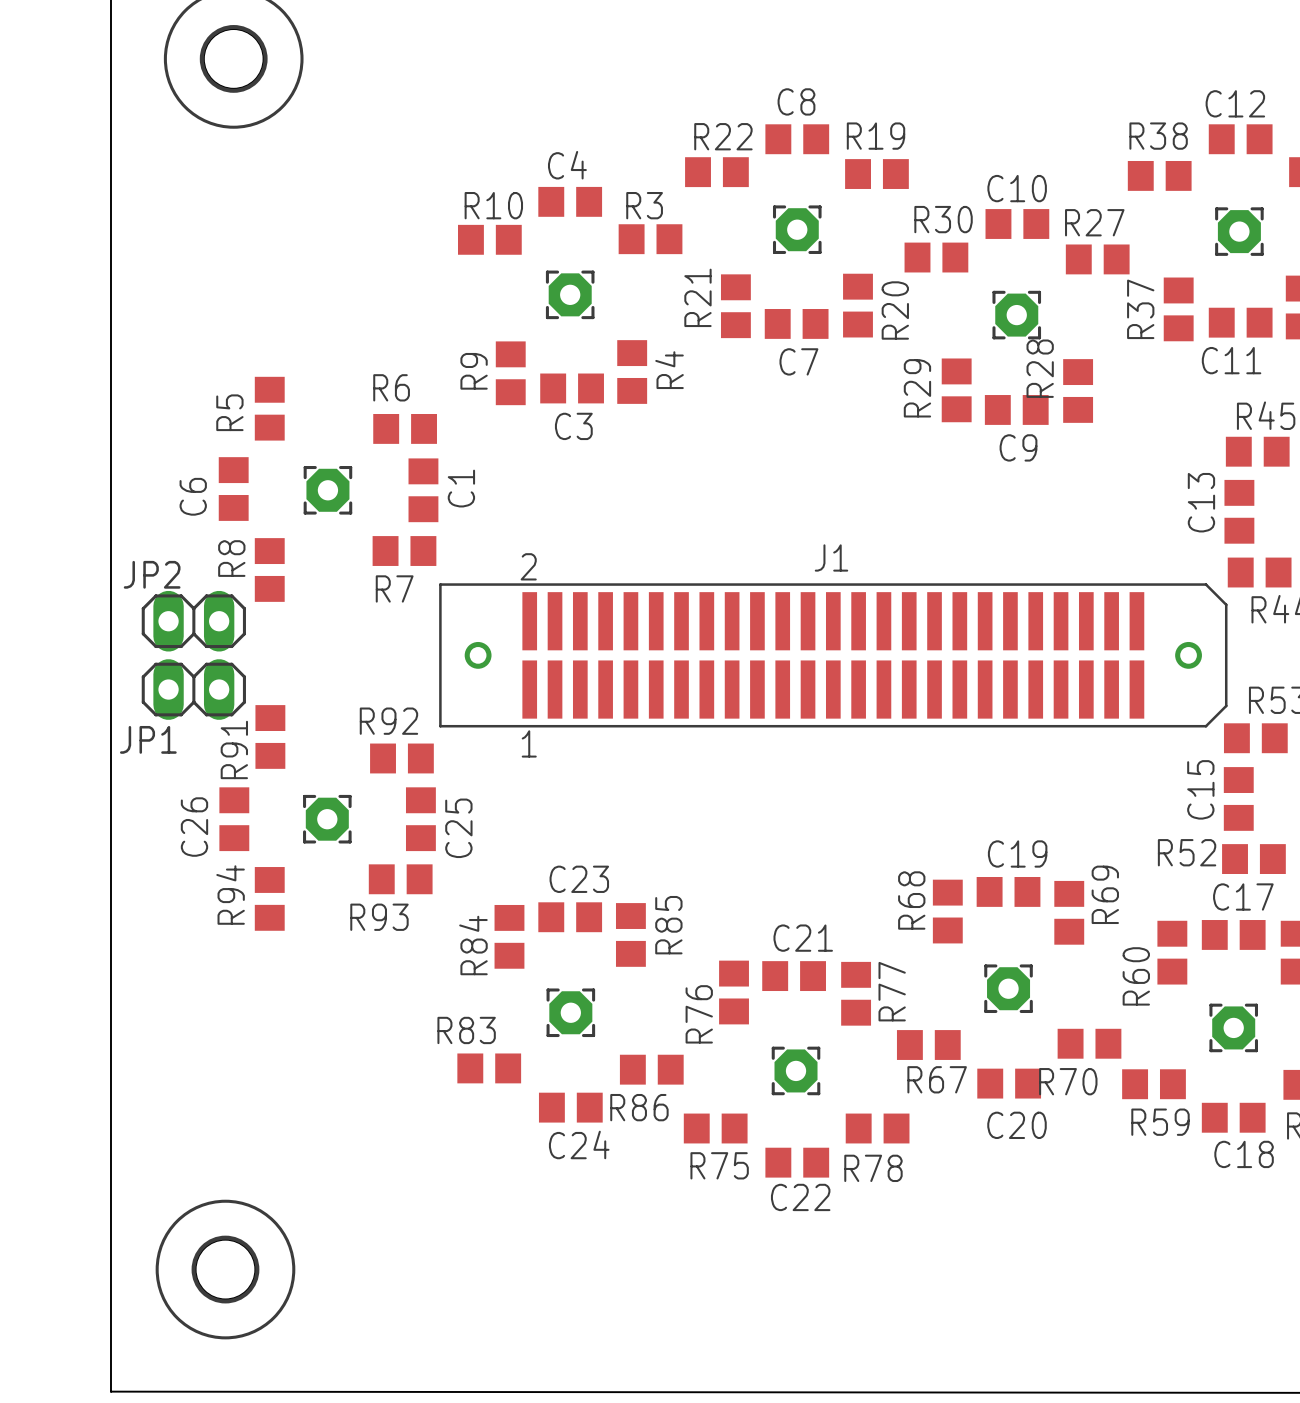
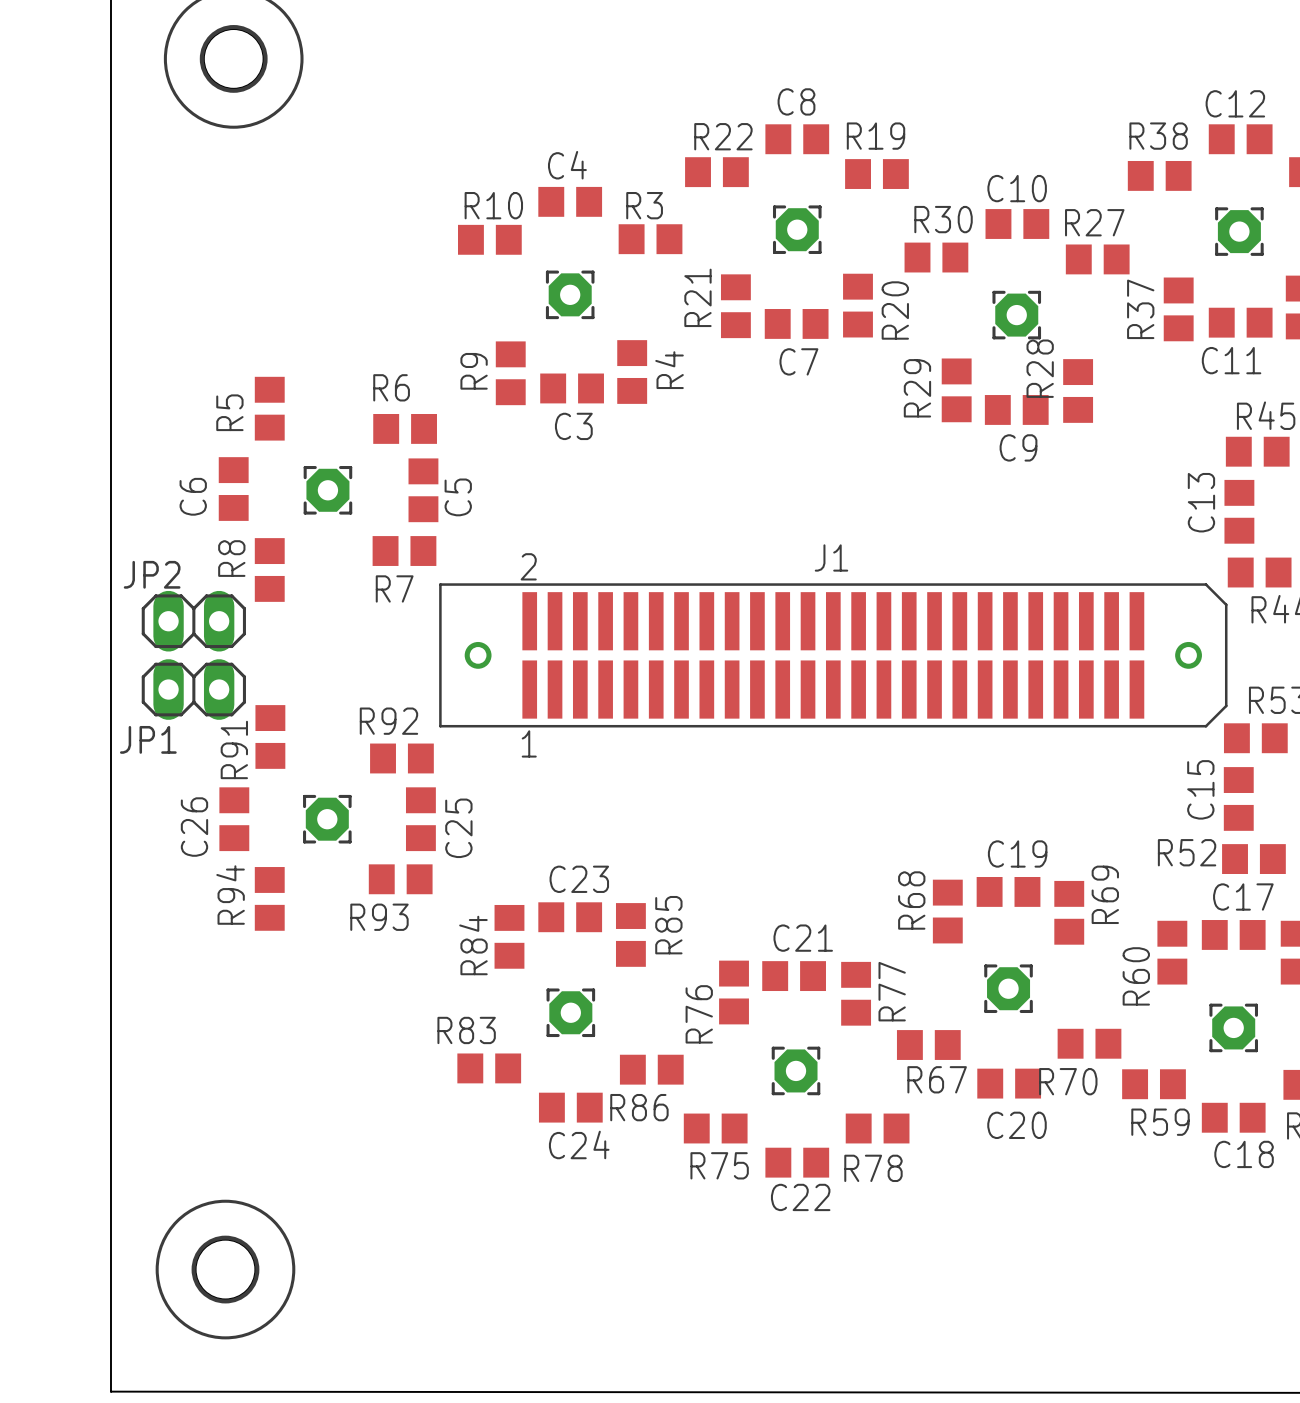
C1 name: C1 (461, 488) -> C5 (458, 497)

